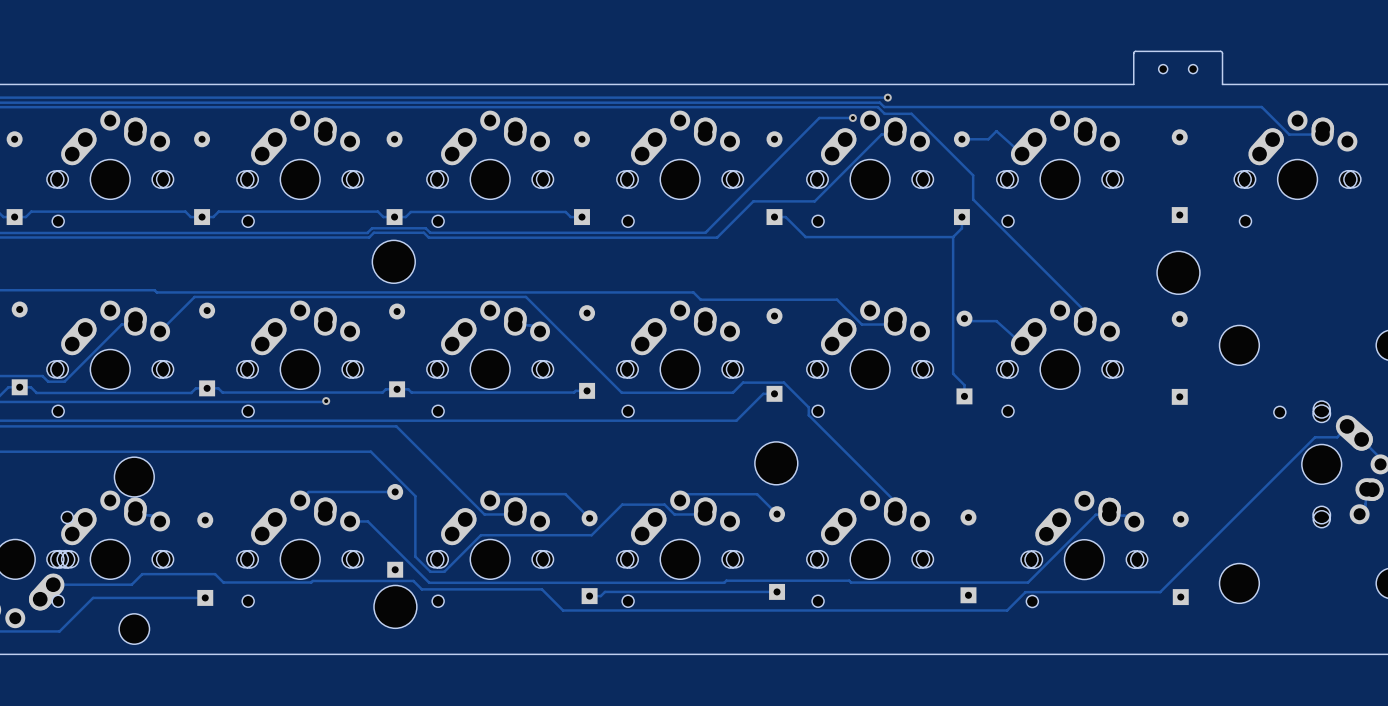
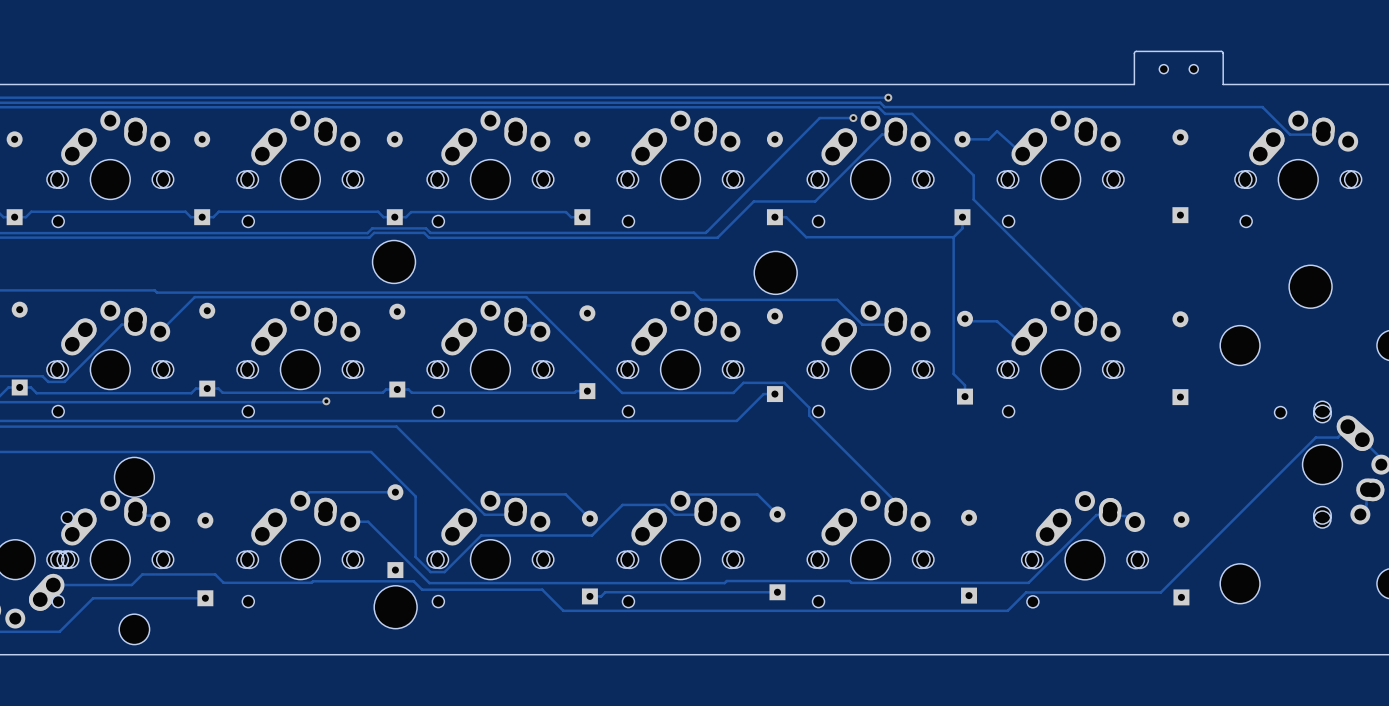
part position: (1178, 272) -> (1310, 286)
part position: (776, 463) -> (775, 272)

